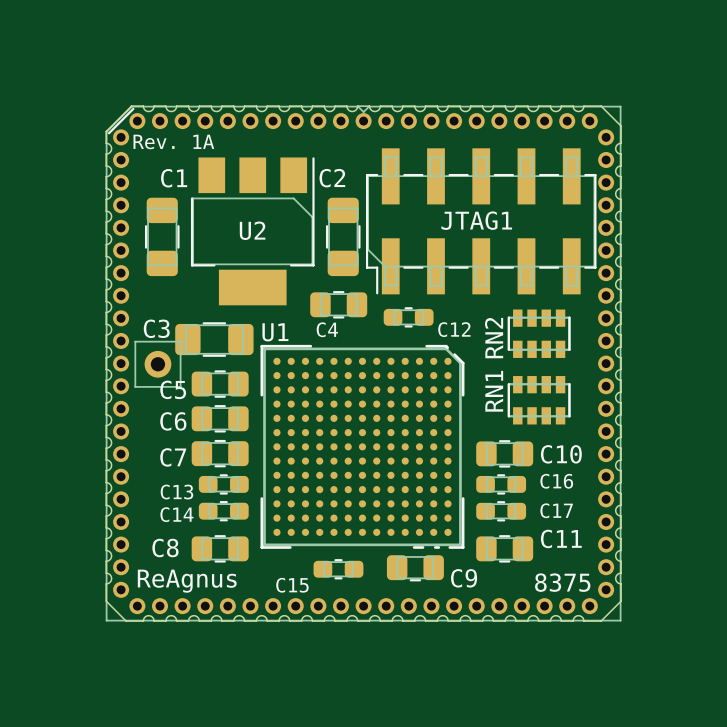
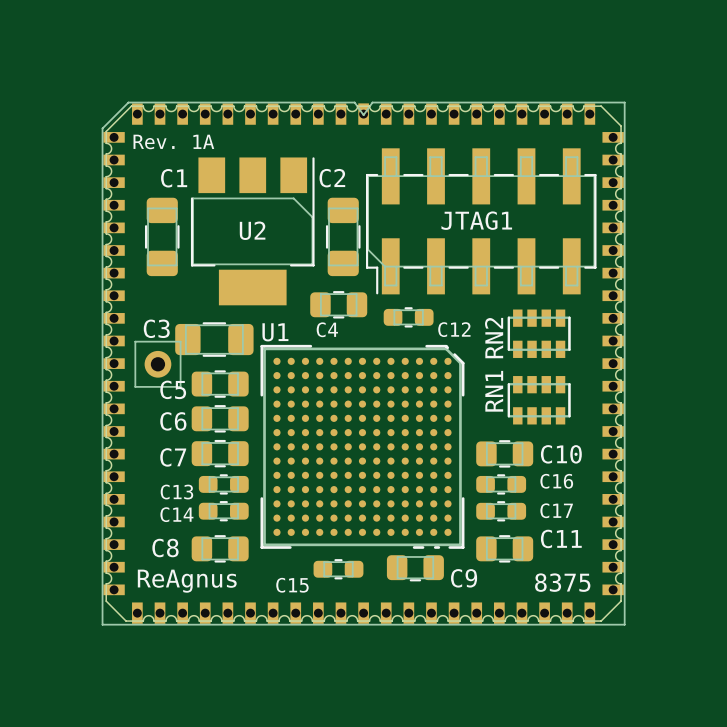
part footprint: [105, 105, 622, 622] -> [101, 101, 626, 626]
line: (133, 108) (108, 133) -> none

